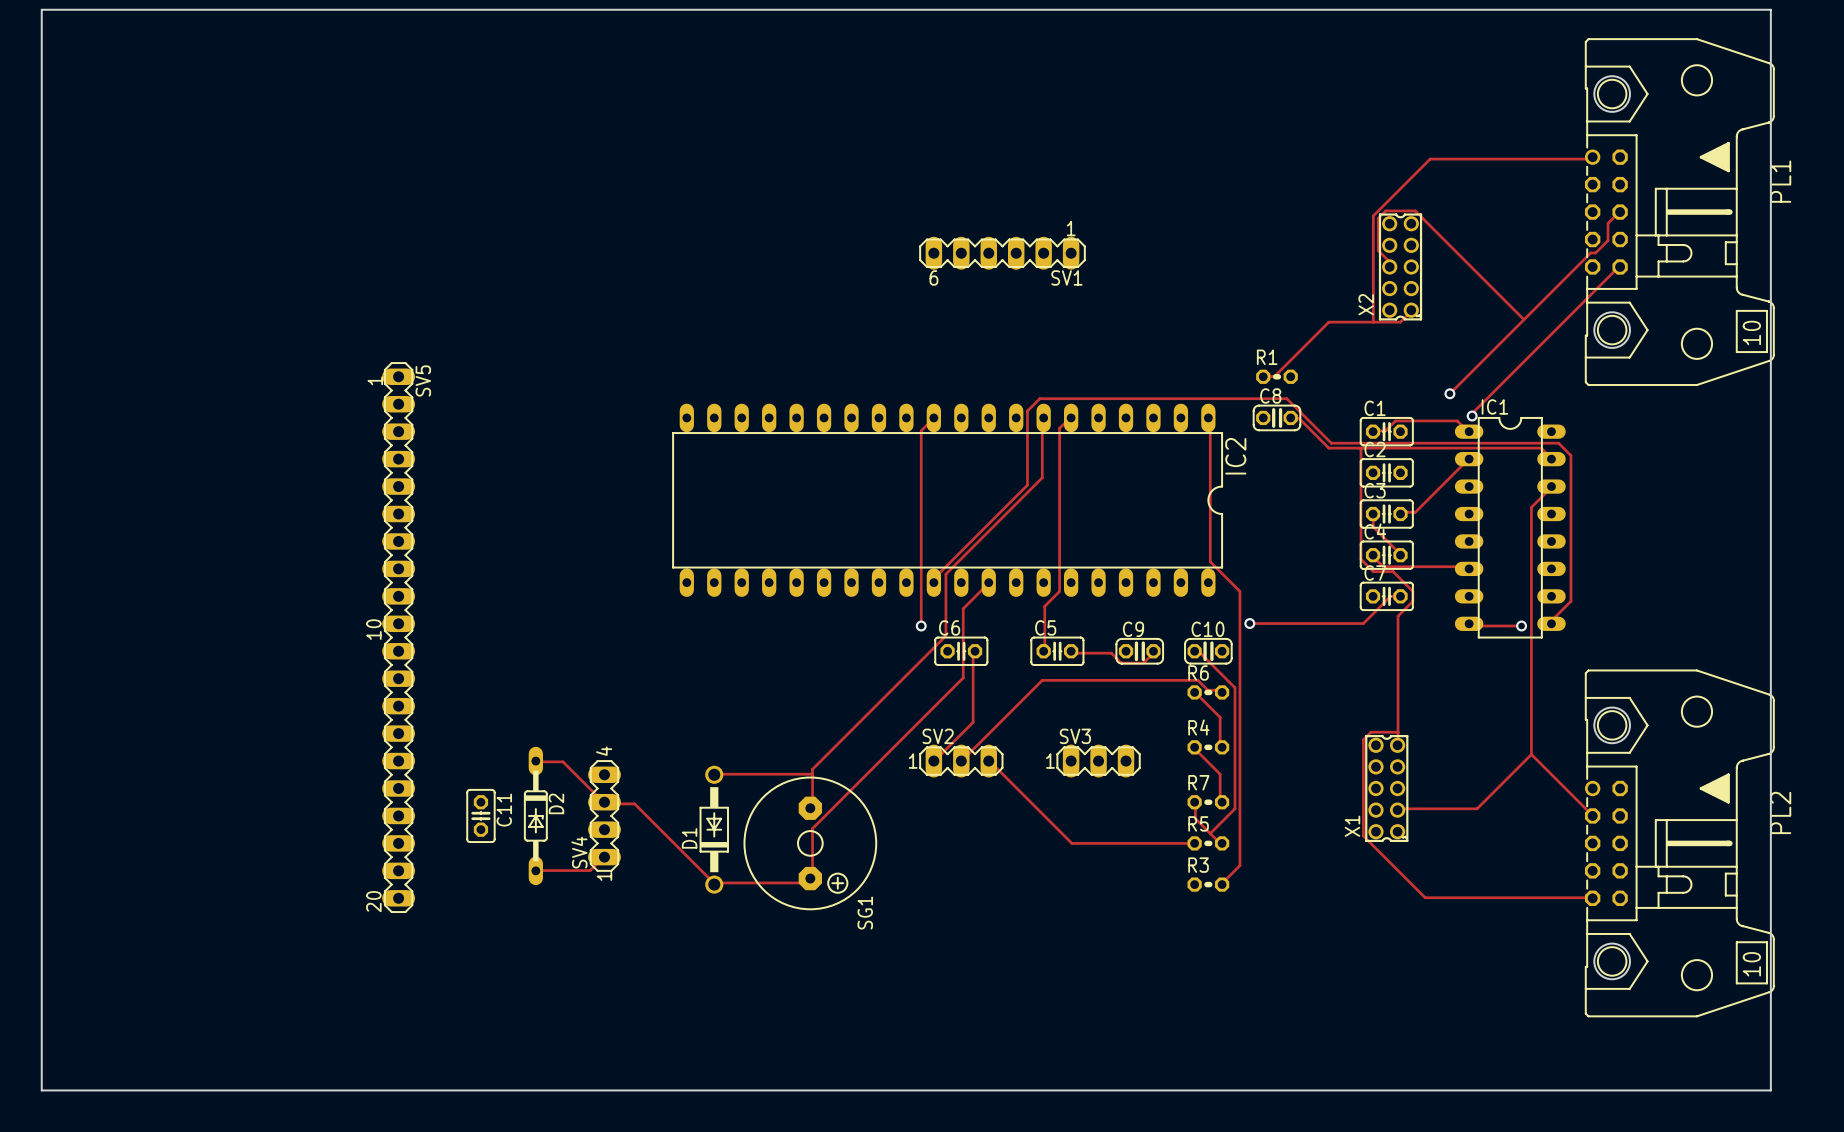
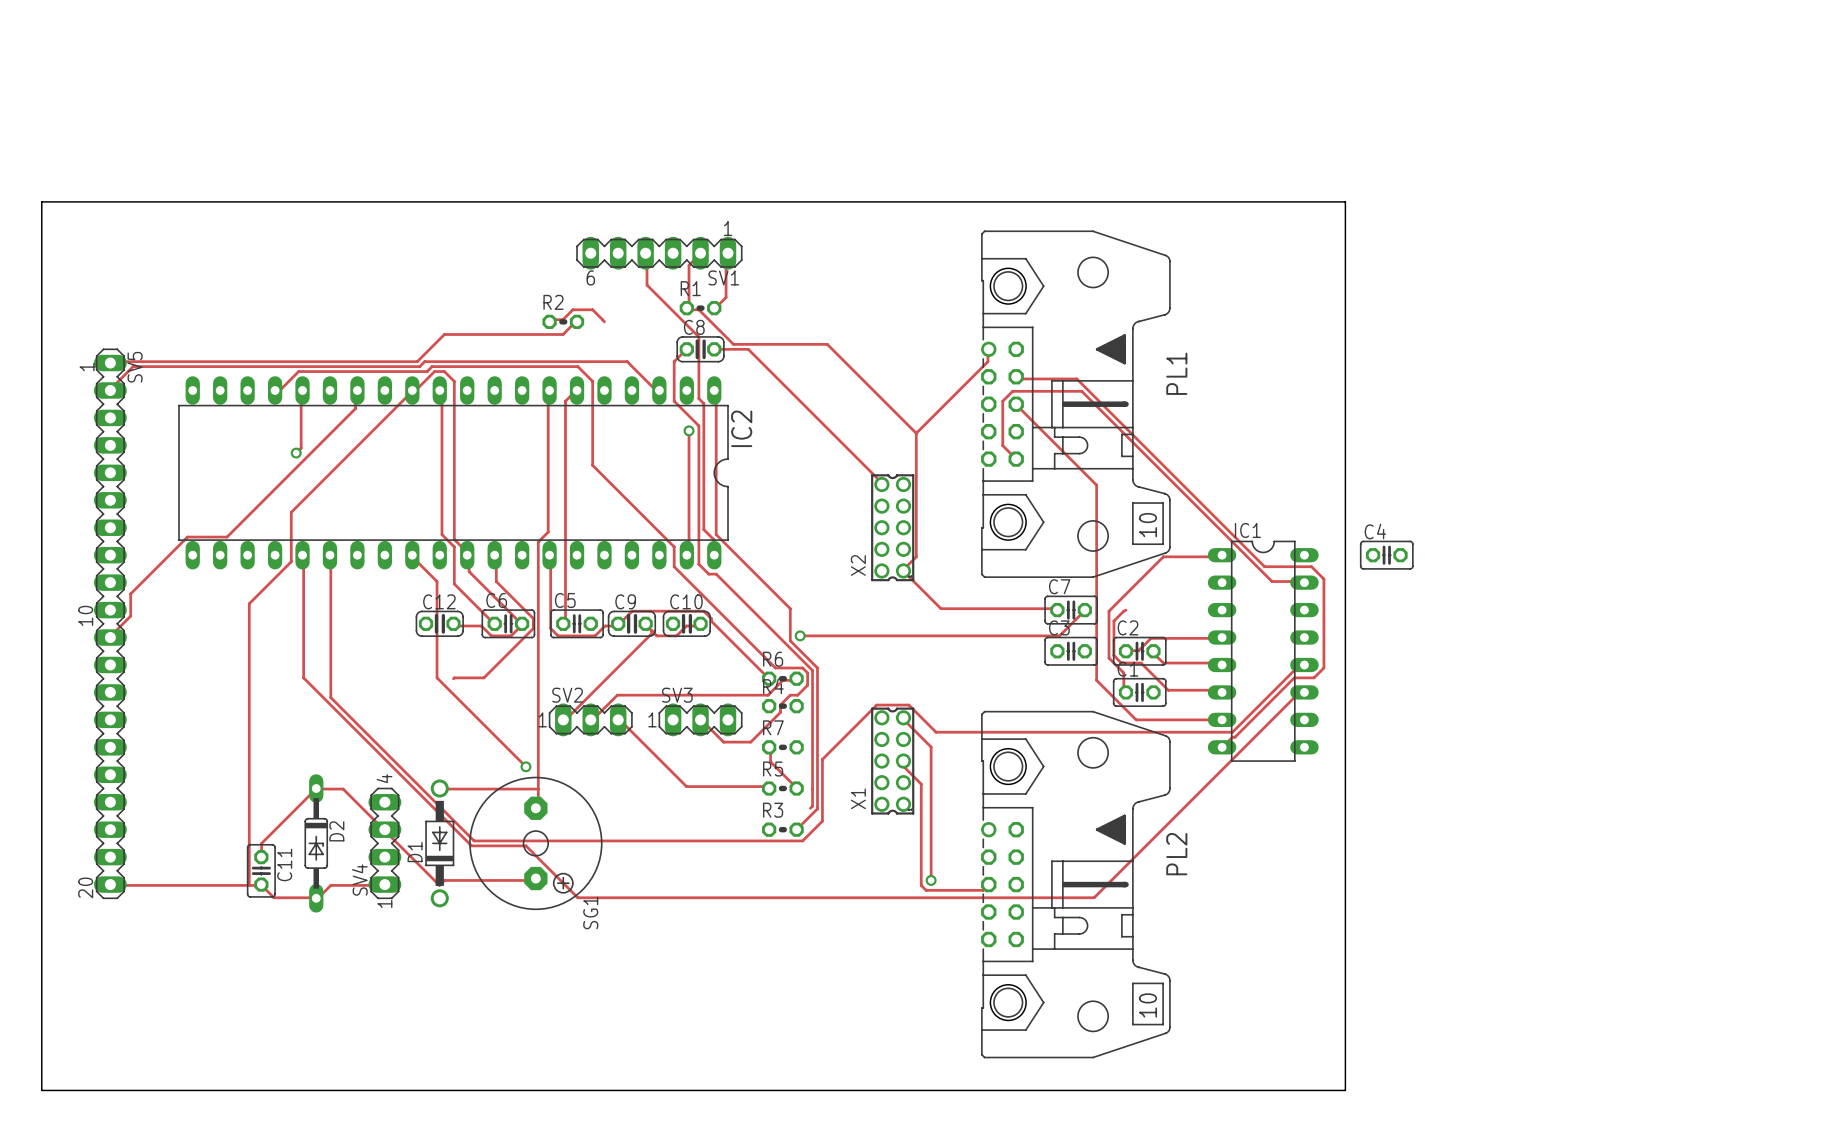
track: (1592, 157) (1590, 159) (1430, 159) (1373, 215) (1373, 322) -> none
board edge: (41, 201) (41, 9) (1770, 9) (1770, 1090) (1345, 1090) -> (41, 201) (1345, 201) (1345, 1090)
track: (1620, 212) (1608, 223) (1608, 240) (1595, 252) (1590, 252) (1449, 393) -> none
PL1 position: (1679, 212) -> (1075, 404)
track: none -> (645, 253) (647, 285) (698, 336) (698, 398) (703, 403) (703, 529) (713, 539) (714, 555)
track: none -> (700, 253) (689, 265) (689, 307) (686, 308) (698, 309) (733, 344) (827, 344) (916, 433)
track: none -> (728, 253) (726, 255) (726, 297) (714, 308)
SV1 position: (1002, 253) -> (659, 253)
track: (1389, 266) (1388, 260) (1378, 250) (1378, 218) (1385, 210) (1415, 210) (1524, 319) -> none
X2 position: (1400, 266) -> (892, 527)
track: (1620, 266) (1472, 413) (1472, 416) -> none
track: (1411, 310) (1400, 322) (1328, 322) (1274, 376) (1263, 376) -> none
track: none -> (549, 321) (550, 319) (563, 319) (572, 309) (592, 309) (604, 321)
R2: none -> (563, 321)
track: none -> (577, 321) (563, 334) (444, 334) (417, 361) (110, 363)
track: none -> (714, 349) (748, 349) (881, 484)
track: none -> (988, 349) (987, 361) (916, 433)
R1 position: (1276, 376) -> (700, 308)
track: none -> (110, 390) (133, 366) (419, 366) (424, 361) (627, 361) (654, 388) (659, 388) (659, 390)
track: none -> (275, 390) (281, 388) (298, 371) (427, 371) (432, 366) (577, 366) (592, 381) (592, 465) (674, 546) (674, 566) (775, 668) (802, 668) (807, 672) (807, 685) (797, 695) (790, 695) (780, 705) (780, 712) (750, 742) (723, 742) (700, 719)
track: none -> (302, 390) (301, 448) (296, 453)
track: none -> (357, 390) (355, 391) (355, 408) (227, 537) (187, 537) (130, 593) (130, 616) (110, 637)
track: none -> (439, 390) (441, 391) (441, 534) (454, 546) (454, 584) (494, 623)
track: none -> (549, 390) (548, 532) (538, 542) (538, 803) (535, 808)
track: none -> (577, 390) (565, 401) (565, 623) (563, 623)
track: none -> (714, 390) (716, 391) (716, 534) (790, 608) (790, 640) (817, 668) (817, 808) (796, 829)
via: (1449, 393) -> none
track: none -> (1016, 404) (1096, 485) (1096, 680) (1136, 719) (1222, 719)
via: (1472, 416) -> none
track: (933, 417) (921, 430) (921, 626) -> none
track: (1043, 417) (1042, 477) (945, 574) (945, 635) (876, 705) -> (1304, 664) (1299, 665) (1232, 732) (936, 732) (908, 705) (876, 705)
track: (1071, 417) (1059, 428) (1059, 591) (1044, 606) (1043, 651) -> none
track: (1208, 417) (1210, 418) (1210, 561) (1239, 591) (1239, 865) (1222, 884) -> none
C8 position: (1276, 417) -> (700, 349)
track: (1290, 417) (1299, 418) (1328, 448) (1541, 448) (1551, 459) -> none
track: none -> (689, 430) (689, 554) (686, 555)
via: none -> (689, 430)
track: (1373, 431) (1385, 430) (1395, 420) (1457, 420) (1469, 431) -> none
C1 position: (1386, 431) -> (1139, 692)
track: none -> (916, 433) (916, 556) (903, 569) (903, 571) (941, 608) (1057, 610)
track: (1360, 448) (1360, 559) (1373, 571) (1393, 571) (1412, 591) (1412, 601) (1398, 616) (1397, 745) -> none
via: none -> (296, 453)
track: none -> (1016, 459) (1002, 445) (1002, 401) (1012, 391) (1081, 391) (1272, 581) (1304, 582)
track: (1469, 459) (1415, 512) (1400, 512) (1400, 514) -> none
C2 position: (1386, 472) -> (1139, 651)
track: (1551, 486) (1531, 507) (1531, 754) -> none
IC2 position: (947, 500) -> (453, 472)
track: (1373, 514) (1373, 527) (1400, 555) -> none
C3 position: (1386, 514) -> (1071, 651)
IC1 position: (1510, 527) -> (1263, 651)
track: none -> (302, 555) (303, 677) (471, 845) (525, 845) (577, 897) (1094, 897) (1299, 692) (1304, 692)
track: none -> (329, 555) (330, 697) (474, 840) (802, 840) (822, 821) (822, 759)
track: none -> (412, 555) (437, 581) (437, 677) (525, 766)
track: none -> (494, 555) (496, 556) (496, 581) (533, 618) (533, 628) (483, 677) (453, 678)
track: none -> (549, 555) (550, 628) (558, 635) (595, 635) (605, 626) (617, 626) (632, 611) (703, 611) (711, 621) (769, 678)
track: none -> (1222, 555) (1220, 556) (1163, 556) (1109, 611) (1109, 658) (1123, 672) (1123, 690) (1126, 692)
track: (1373, 555) (1383, 566) (1467, 566) (1469, 568) -> none
track: (933, 582) (936, 581) (936, 576) (1027, 485) (1027, 411) (1039, 398) (1286, 398) (1331, 443) (1558, 443) (1570, 455) (1570, 601) (1553, 618) (1553, 623) (1551, 623) -> none
track: (988, 582) (963, 608) (963, 677) (812, 828) (812, 877) (807, 882) (716, 882) (714, 884) (634, 803) (605, 803) (563, 761) (535, 761) -> none
C7 position: (1386, 596) -> (1071, 610)
track: (1400, 596) (1390, 596) (1363, 623) (1249, 623) -> none
track: none -> (1084, 610) (1059, 635) (800, 635)
C12: none -> (439, 623)
track: none -> (453, 623) (454, 626) (481, 626) (491, 635) (511, 635) (522, 623) (469, 571) (469, 556) (467, 555) (469, 554) (454, 539) (454, 381) (444, 371) (434, 371) (417, 388) (412, 388) (412, 391) (291, 512) (291, 561) (249, 603) (249, 885)
track: none -> (645, 623) (656, 635) (676, 635) (686, 626) (698, 626) (700, 623)
via: (1249, 623) -> none
track: (1469, 623) (1469, 626) (1521, 626) -> none
via: (921, 626) -> none
via: (1521, 626) -> none
track: none -> (651, 630) (651, 633) (565, 719) (563, 719)
via: none -> (800, 635)
SV5 position: (398, 637) -> (110, 623)
track: none -> (1222, 637) (1150, 638) (1138, 650) (1126, 651)
C6 position: (961, 651) -> (508, 623)
track: (975, 651) (973, 653) (973, 722) (933, 761) -> none
C5 position: (1057, 651) -> (577, 623)
track: (1071, 651) (1071, 653) (1111, 653) (1113, 655) -> (1126, 610) (1113, 621) (1113, 655)
C9 position: (1139, 651) -> (631, 623)
track: (1194, 651) (1195, 653) (1200, 653) (1234, 687) (1234, 808) (1210, 833) -> none
C10 position: (1208, 651) -> (686, 623)
track: (1153, 653) (1143, 663) (1141, 663) -> (1207, 690) (1168, 690) (1141, 663)
track: none -> (1153, 653) (1163, 663) (1220, 663) (1222, 664)
track: none -> (796, 678) (782, 680) (768, 695) (617, 695) (590, 719)
track: (1207, 690) (1197, 680) (1042, 680) (961, 761) -> none
track: (1194, 692) (1220, 717) (1220, 747) (1222, 747) -> (1016, 376) (1017, 378) (1076, 378) (1264, 566) (1311, 566) (1323, 579) (1323, 668) (1314, 677) (1294, 677) (1234, 737) (1232, 737) (1222, 747)
R6 position: (1208, 692) -> (782, 678)
track: none -> (903, 717) (931, 747) (931, 880)
track: none -> (618, 719) (686, 786) (768, 786) (769, 788)
track: (1398, 732) (1370, 732) (1363, 739) (1363, 835) (1425, 897) (1592, 898) -> none
track: none -> (769, 747) (770, 761) (796, 788)
track: (1194, 747) (1220, 774) (1220, 801) (1222, 802) -> none
R4 position: (1208, 747) -> (782, 706)
track: (1531, 754) (1592, 815) -> none
track: (1531, 754) (1477, 808) (1397, 810) -> none
track: (822, 759) (812, 769) -> (686, 349) (674, 361) (674, 401) (698, 425) (698, 564) (708, 574) (716, 574) (812, 670) (812, 769)
track: none -> (903, 761) (903, 766) (921, 784) (921, 885) (926, 890) (983, 890) (988, 884)
SV2 position: (961, 761) -> (590, 719)
track: (988, 761) (1071, 843) (1194, 843) -> none
SV3 position: (1098, 761) -> (700, 719)
via: none -> (525, 766)
track: (812, 774) (714, 774) -> none
track: none -> (439, 788) (538, 789)
X1 position: (1386, 788) -> (892, 761)
track: (1194, 802) (1195, 818) (1222, 843) -> none
R7 position: (1208, 802) -> (782, 747)
C11 position: (480, 815) -> (261, 870)
D2 position: (535, 815) -> (316, 843)
SV4 position: (604, 815) -> (384, 843)
D1 position: (714, 829) -> (439, 843)
SG1 position: (810, 843) -> (535, 843)
R5 position: (1208, 843) -> (782, 788)
PL2 position: (1679, 843) -> (1075, 884)
track: none -> (261, 857) (261, 843) (316, 788) (343, 789) (439, 885) (444, 880) (535, 880) (535, 878)
track: (604, 857) (590, 870) (535, 870) -> none
via: none -> (931, 880)
track: none -> (110, 884) (261, 884) (273, 897) (316, 898) (330, 885) (384, 884)
R3 position: (1208, 884) -> (782, 829)

